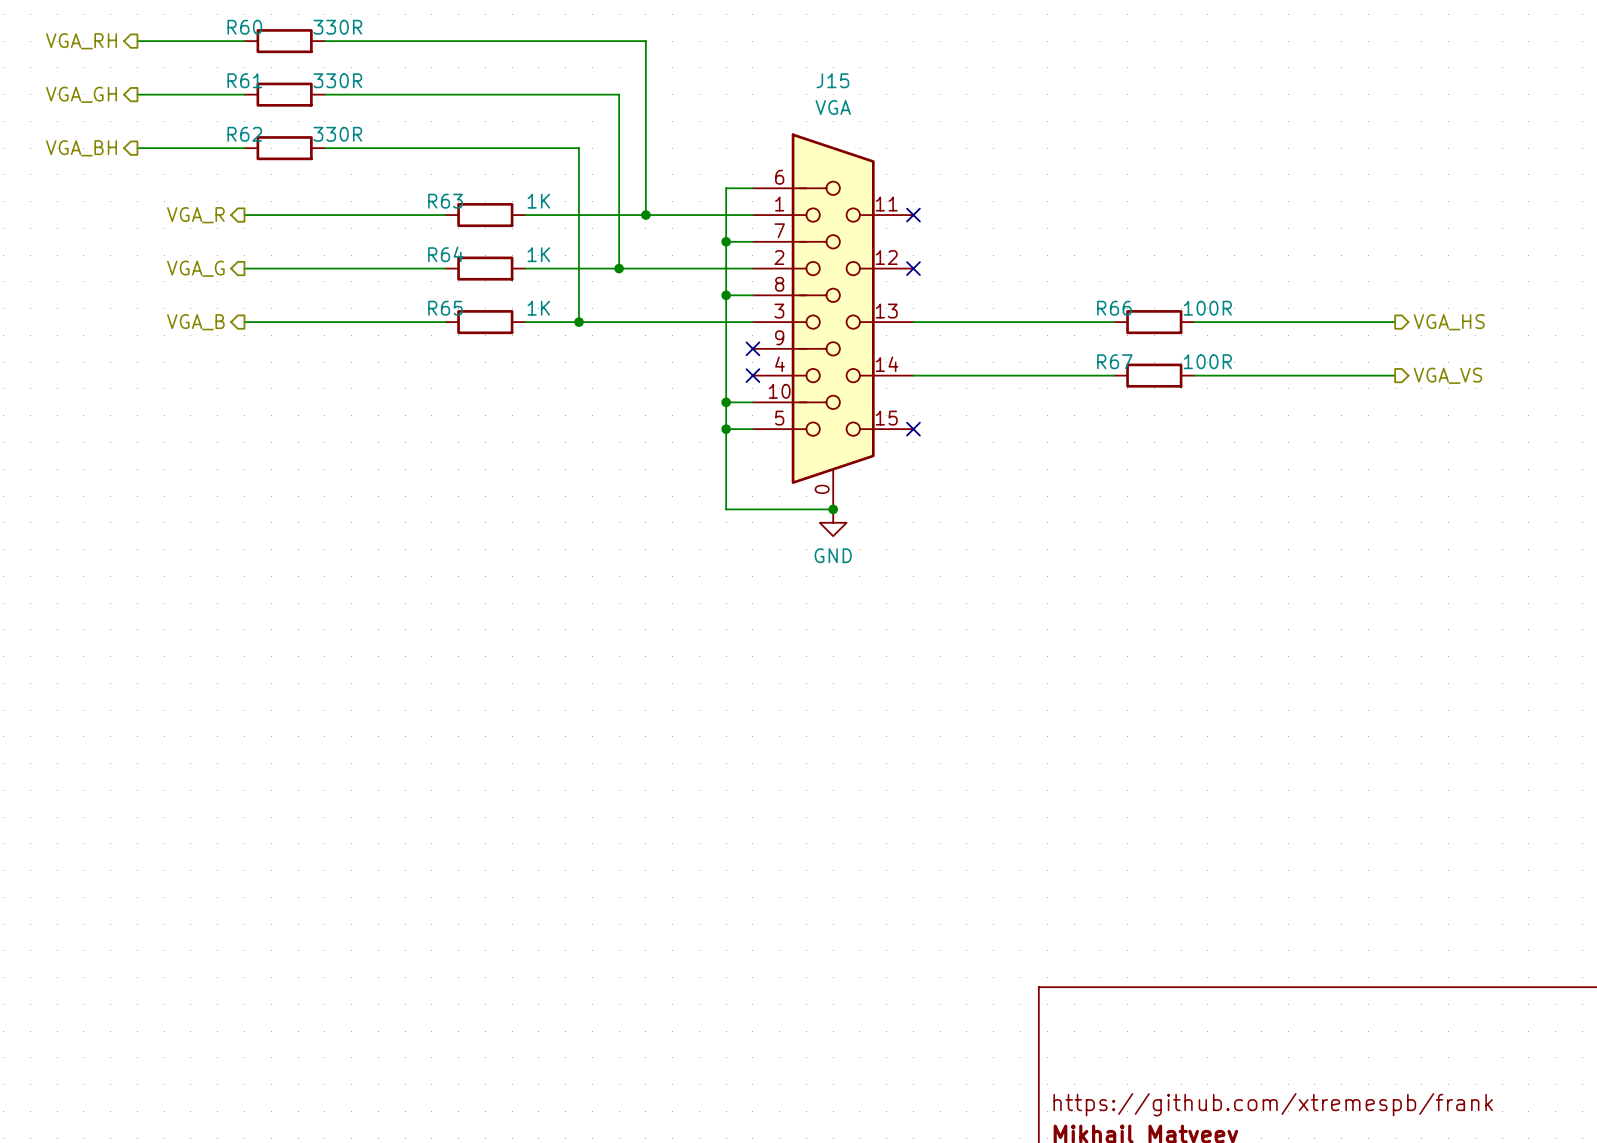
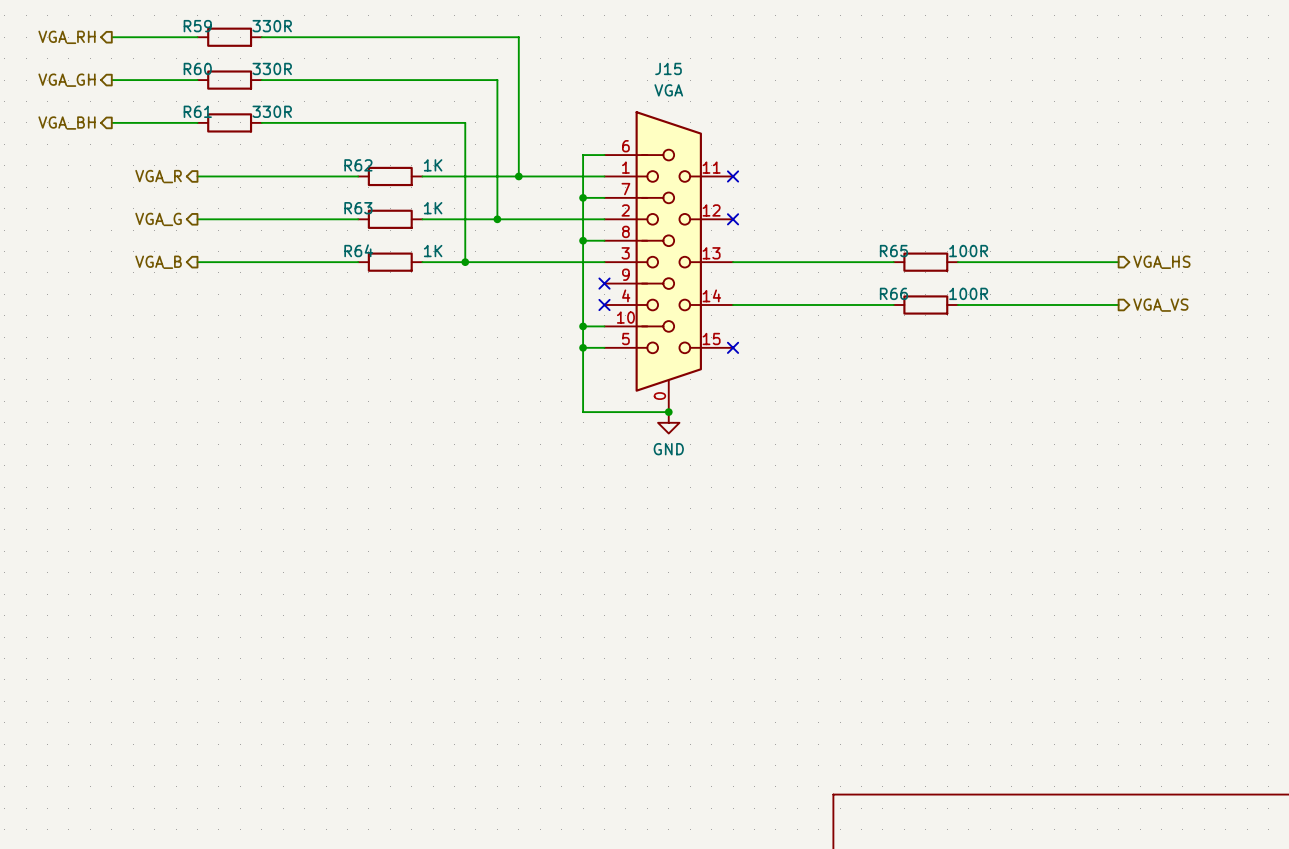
R60 name: R60 (244, 27) -> R59 (197, 26)
R61 name: R61 (244, 80) -> R60 (197, 68)
R62 name: R62 (244, 134) -> R61 (197, 111)
R63 name: R63 (445, 201) -> R62 (358, 165)
R64 name: R64 (445, 254) -> R63 (358, 208)
R65 name: R65 (445, 308) -> R64 (358, 250)
R66 name: R66 (1114, 308) -> R65 (893, 251)
R67 name: R67 (1114, 361) -> R66 (893, 293)

